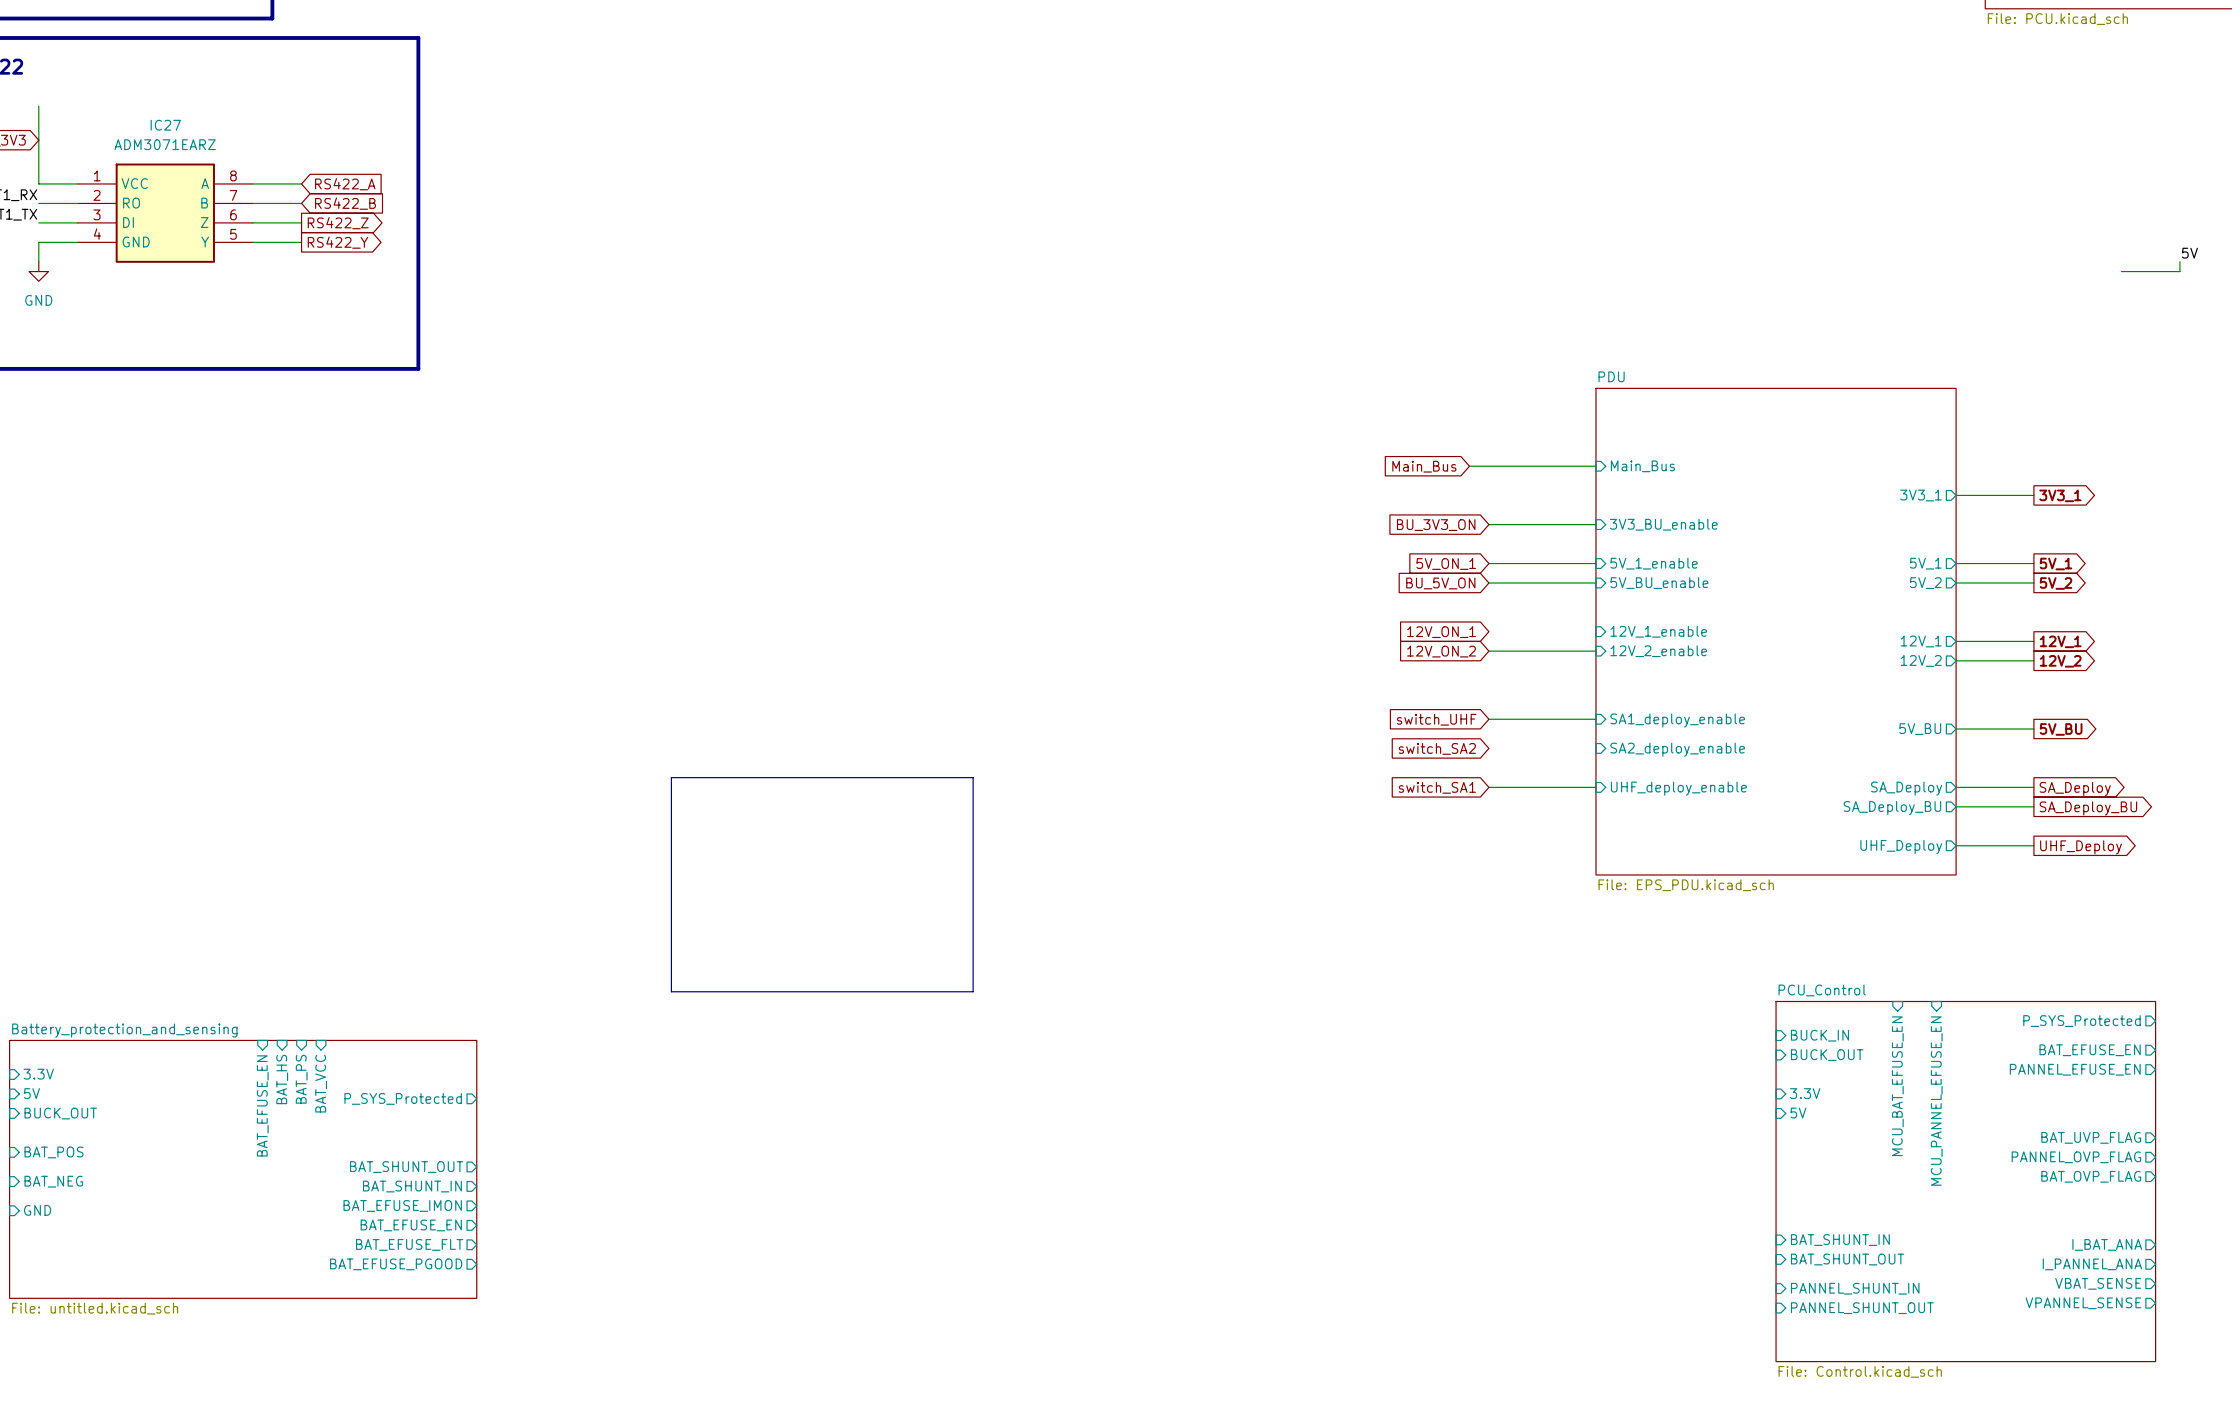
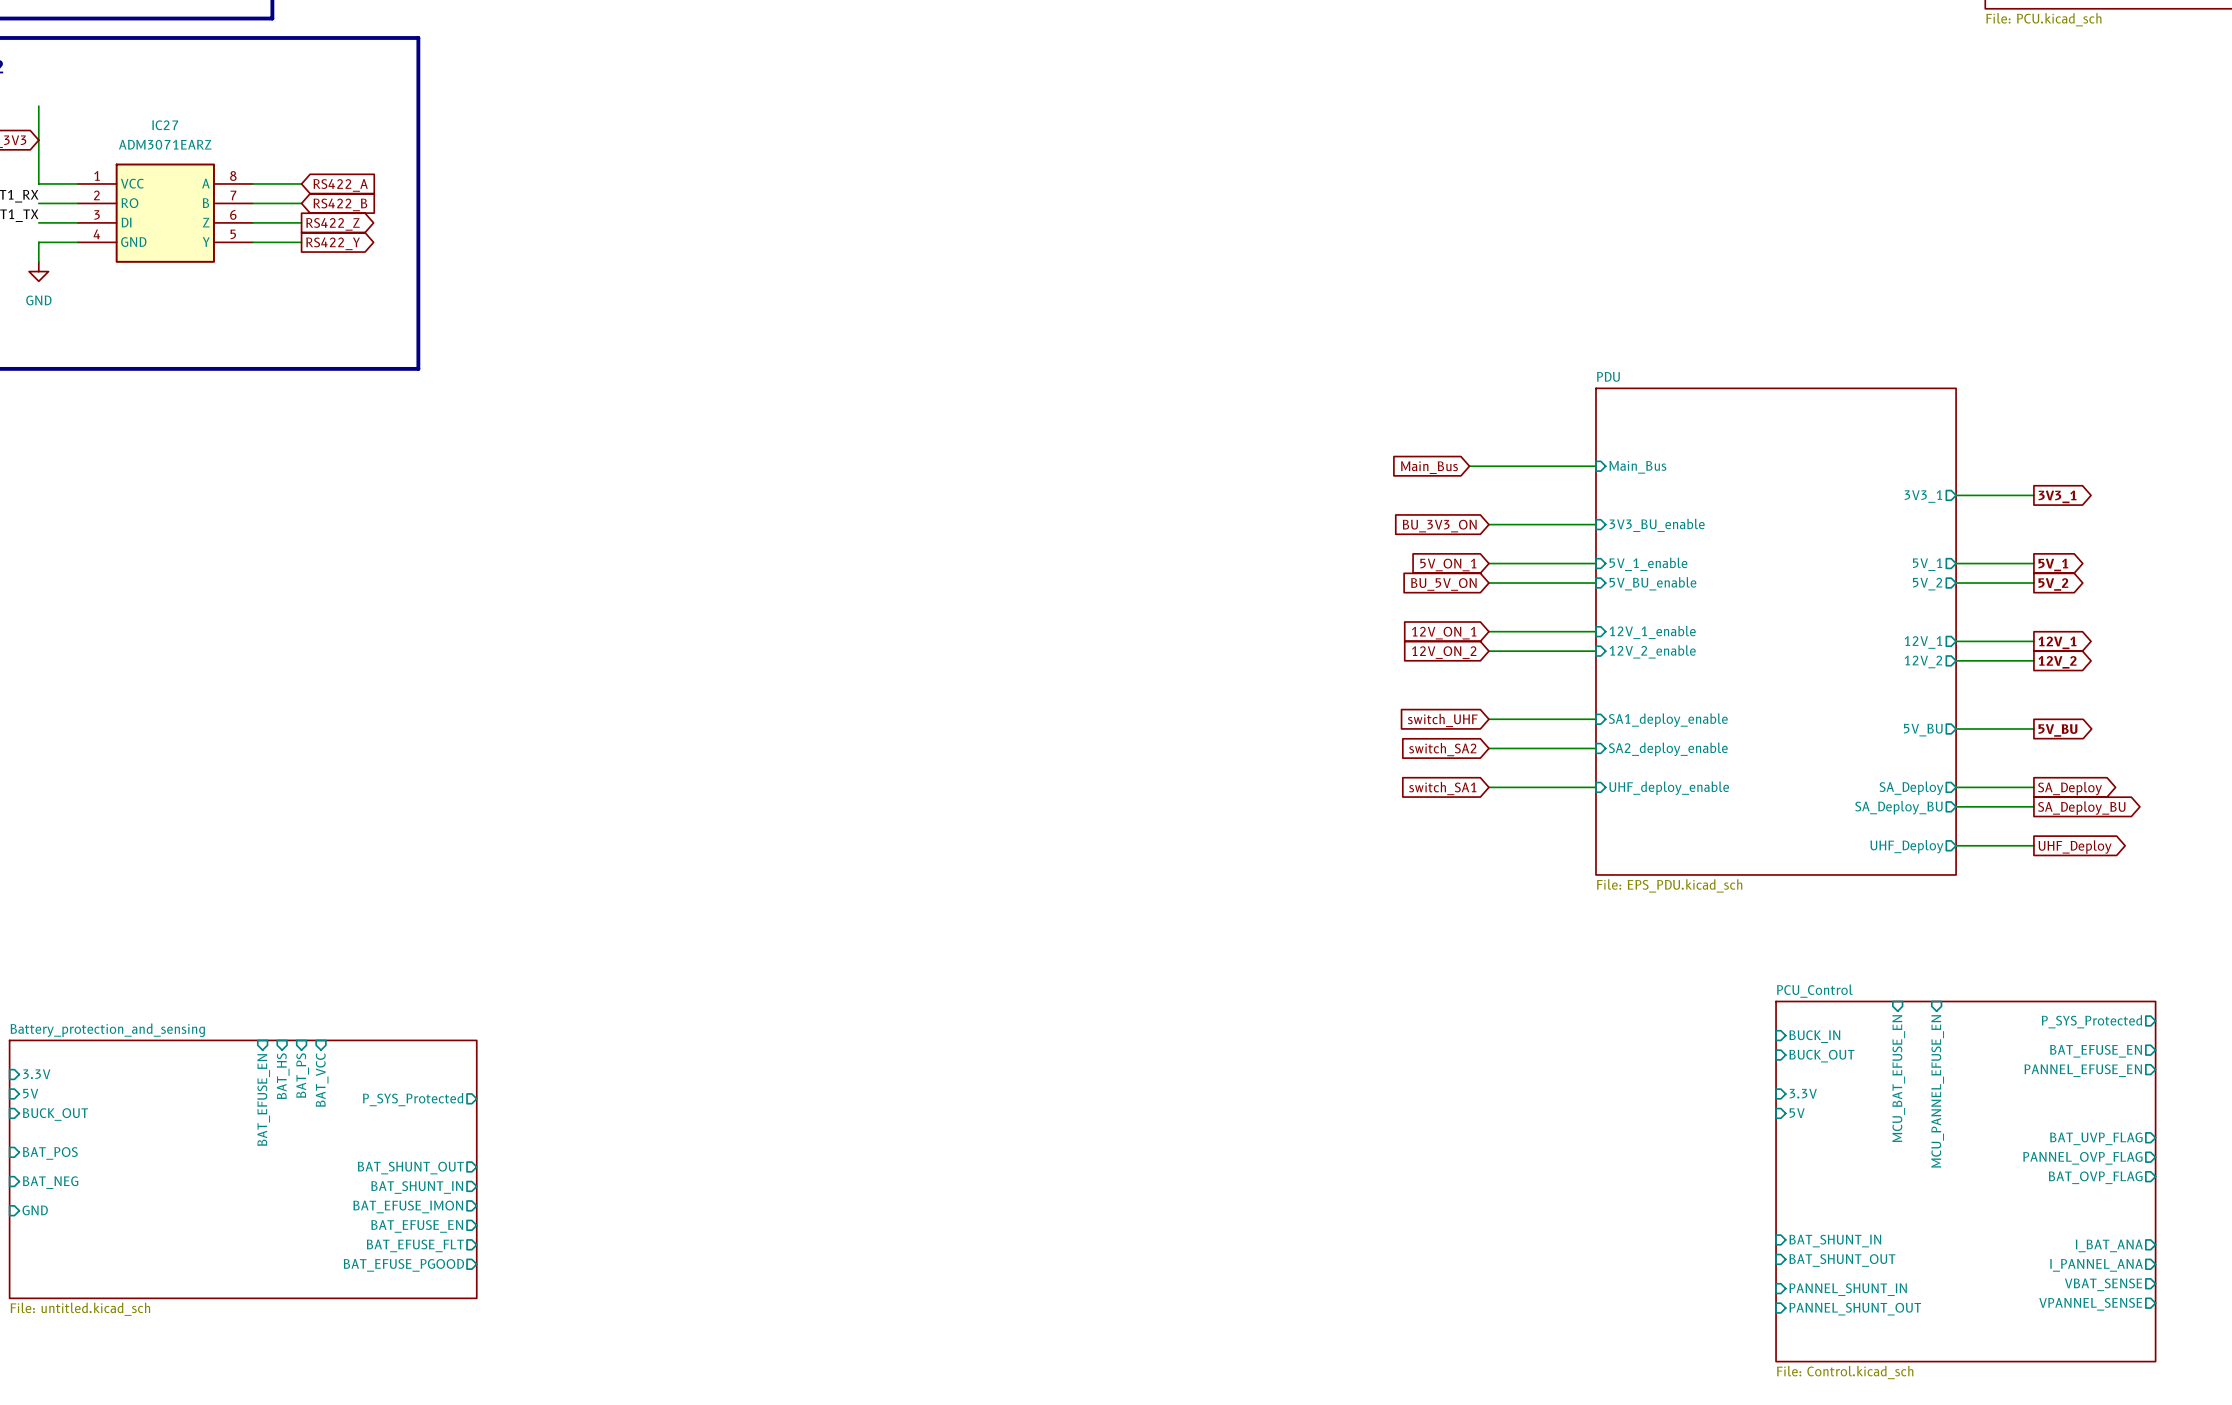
label: 5V (2189, 253) -> none
wire: (2179, 261) (2179, 271) (2121, 271) -> none
wire: none -> (1488, 631) (1595, 631)
wire: none -> (1488, 748) (1595, 748)
line: (671, 777) (973, 777) (973, 991) (671, 991) (671, 777) -> none

